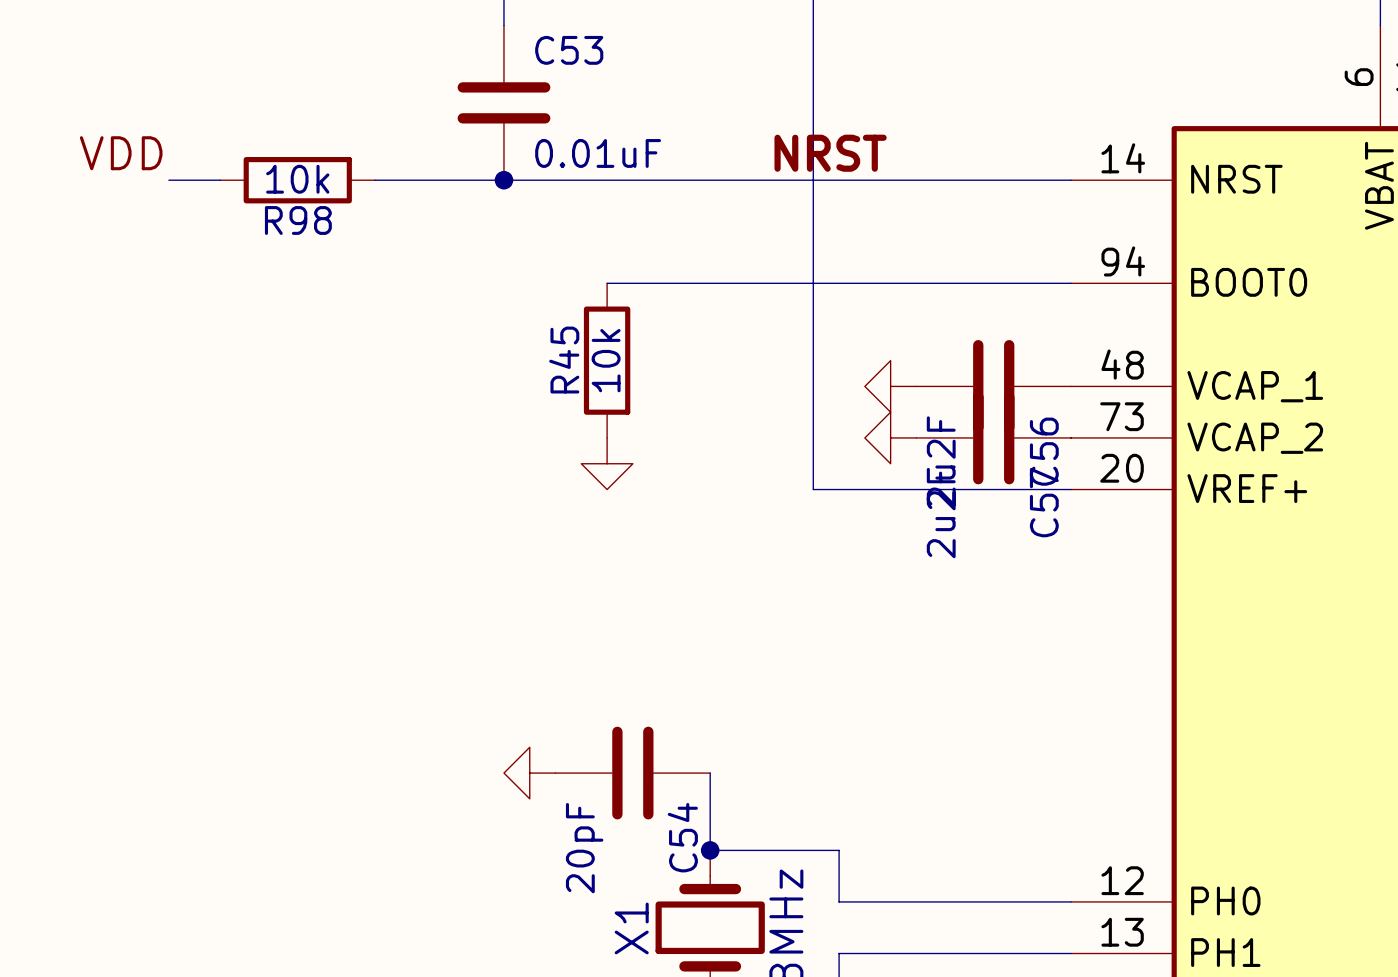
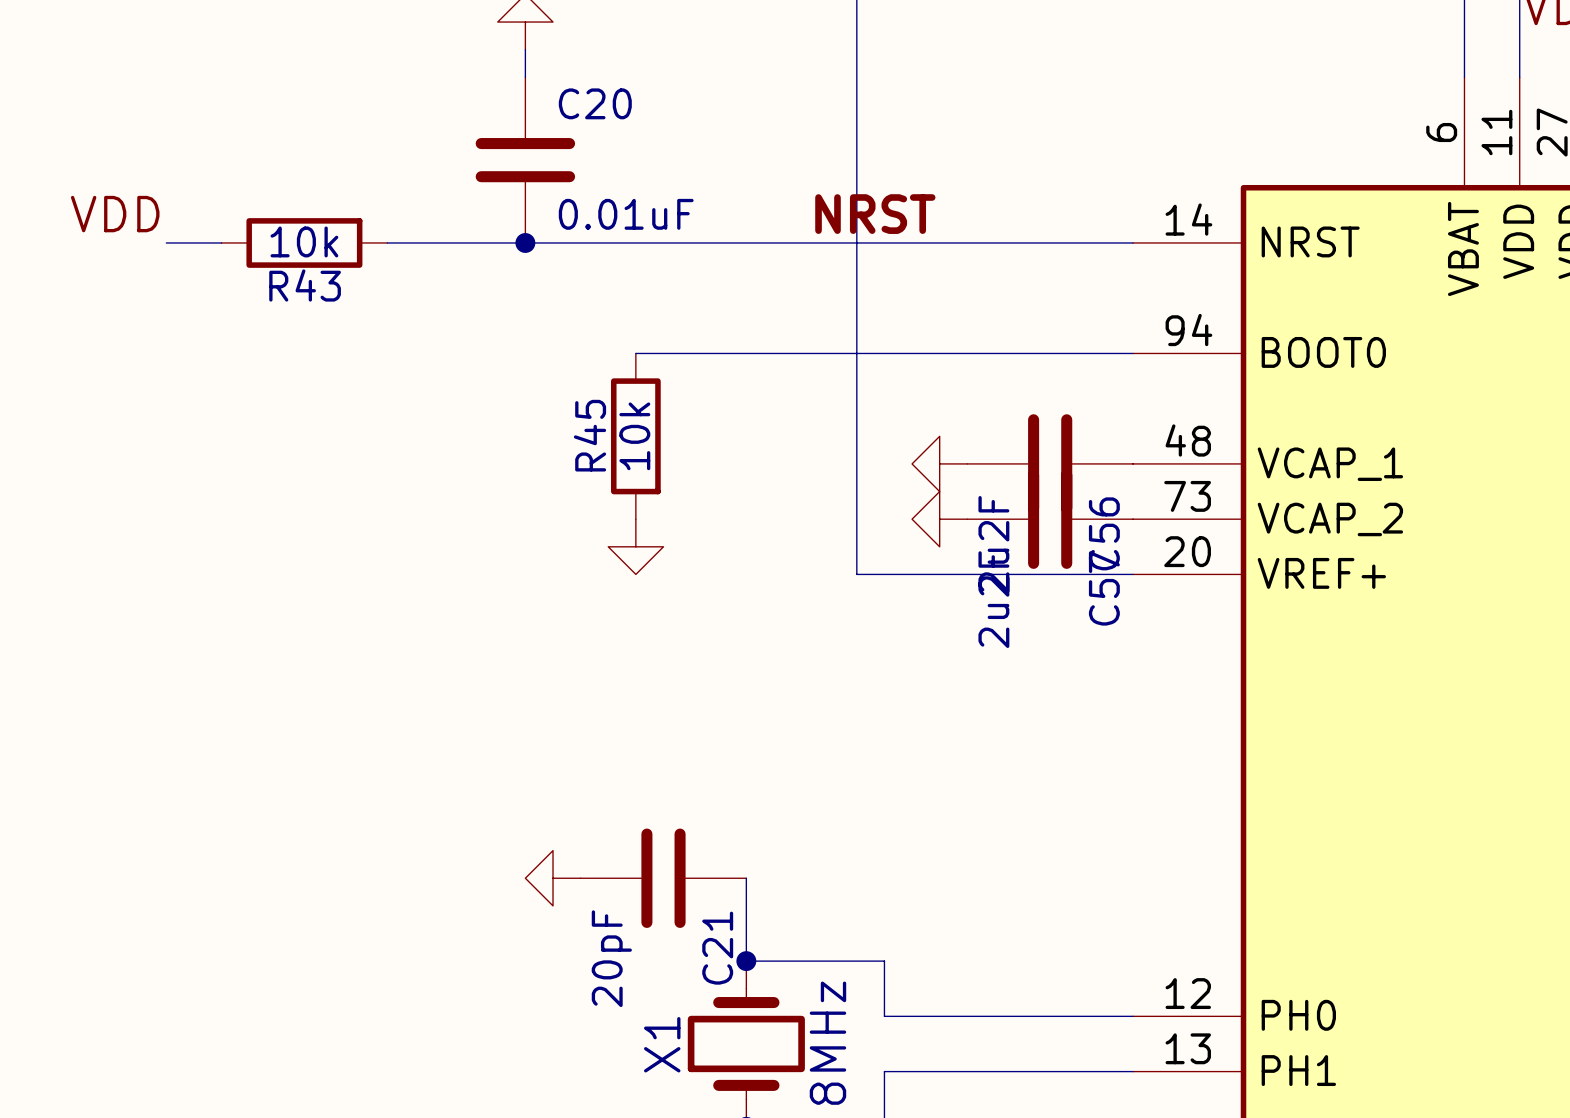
C53 name: C53 (569, 50) -> C20 (595, 103)
R98 name: R98 (298, 220) -> R43 (305, 285)
C54 name: C54 (682, 837) -> C21 (717, 948)

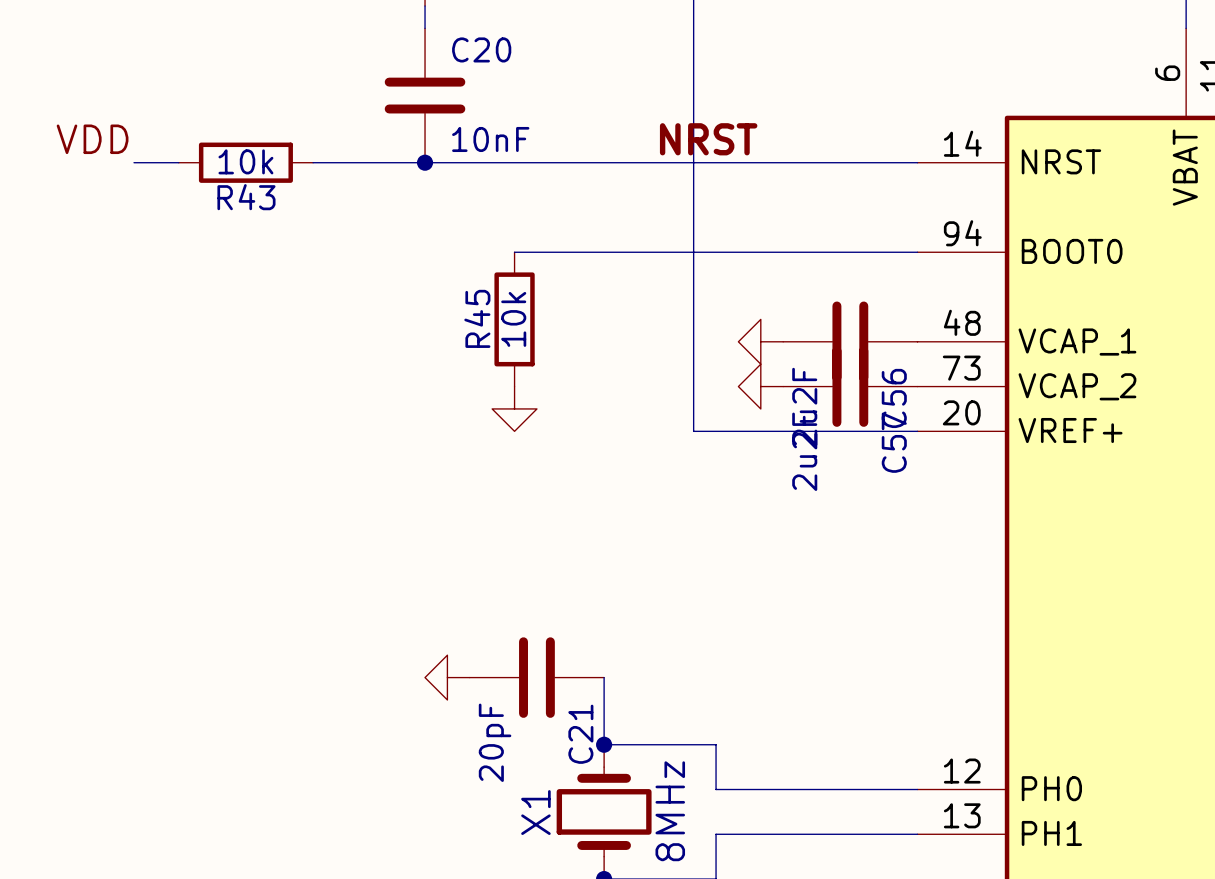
C20 value: 0.01uF (626, 214) -> 10nF (490, 139)

